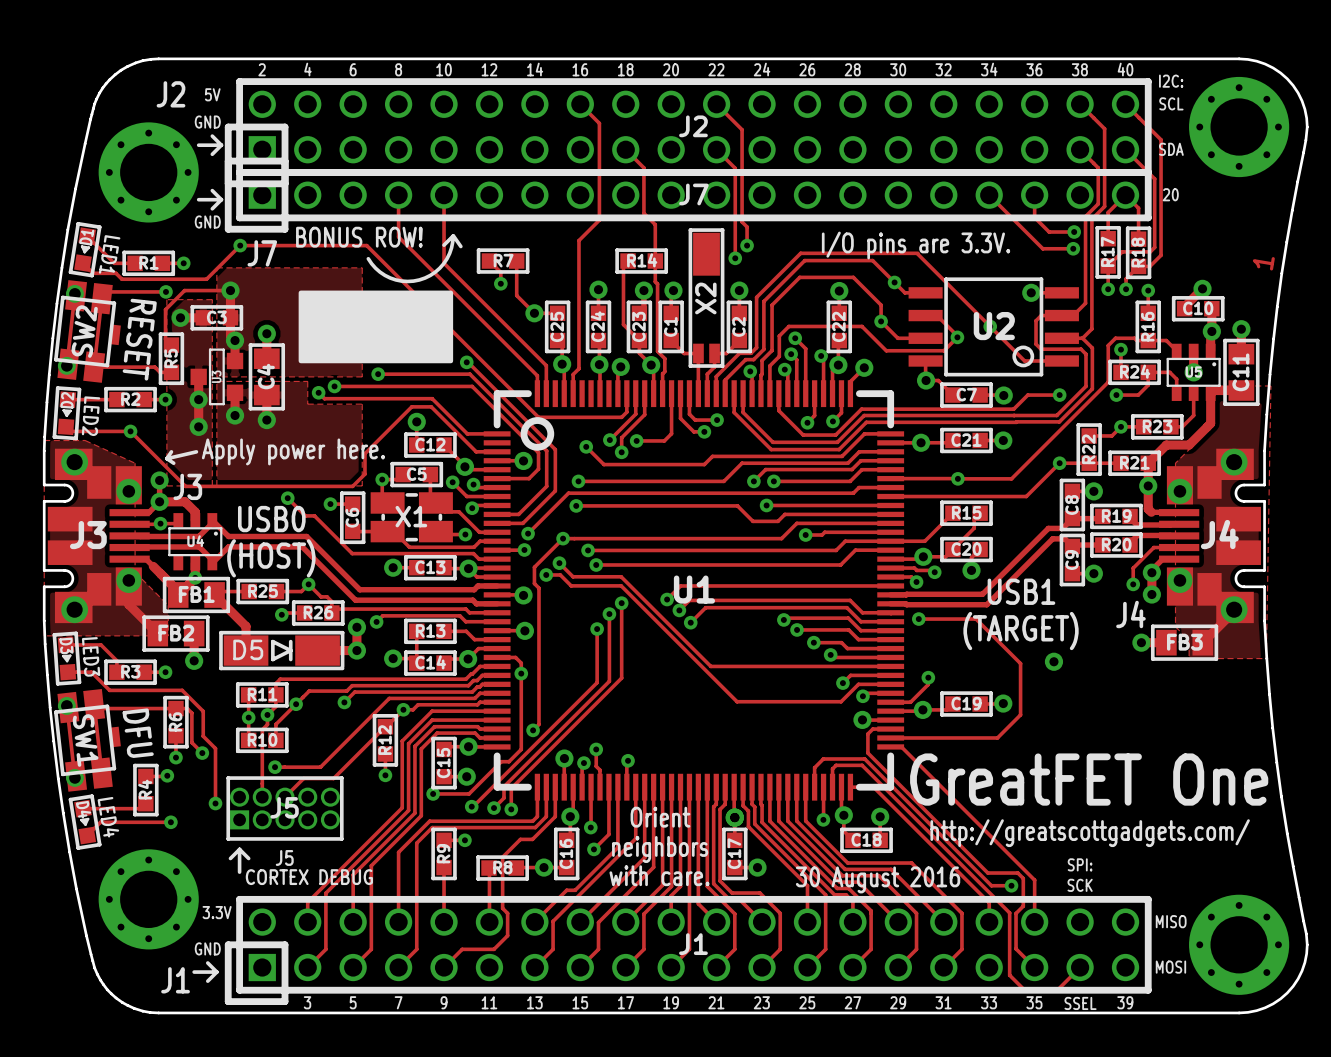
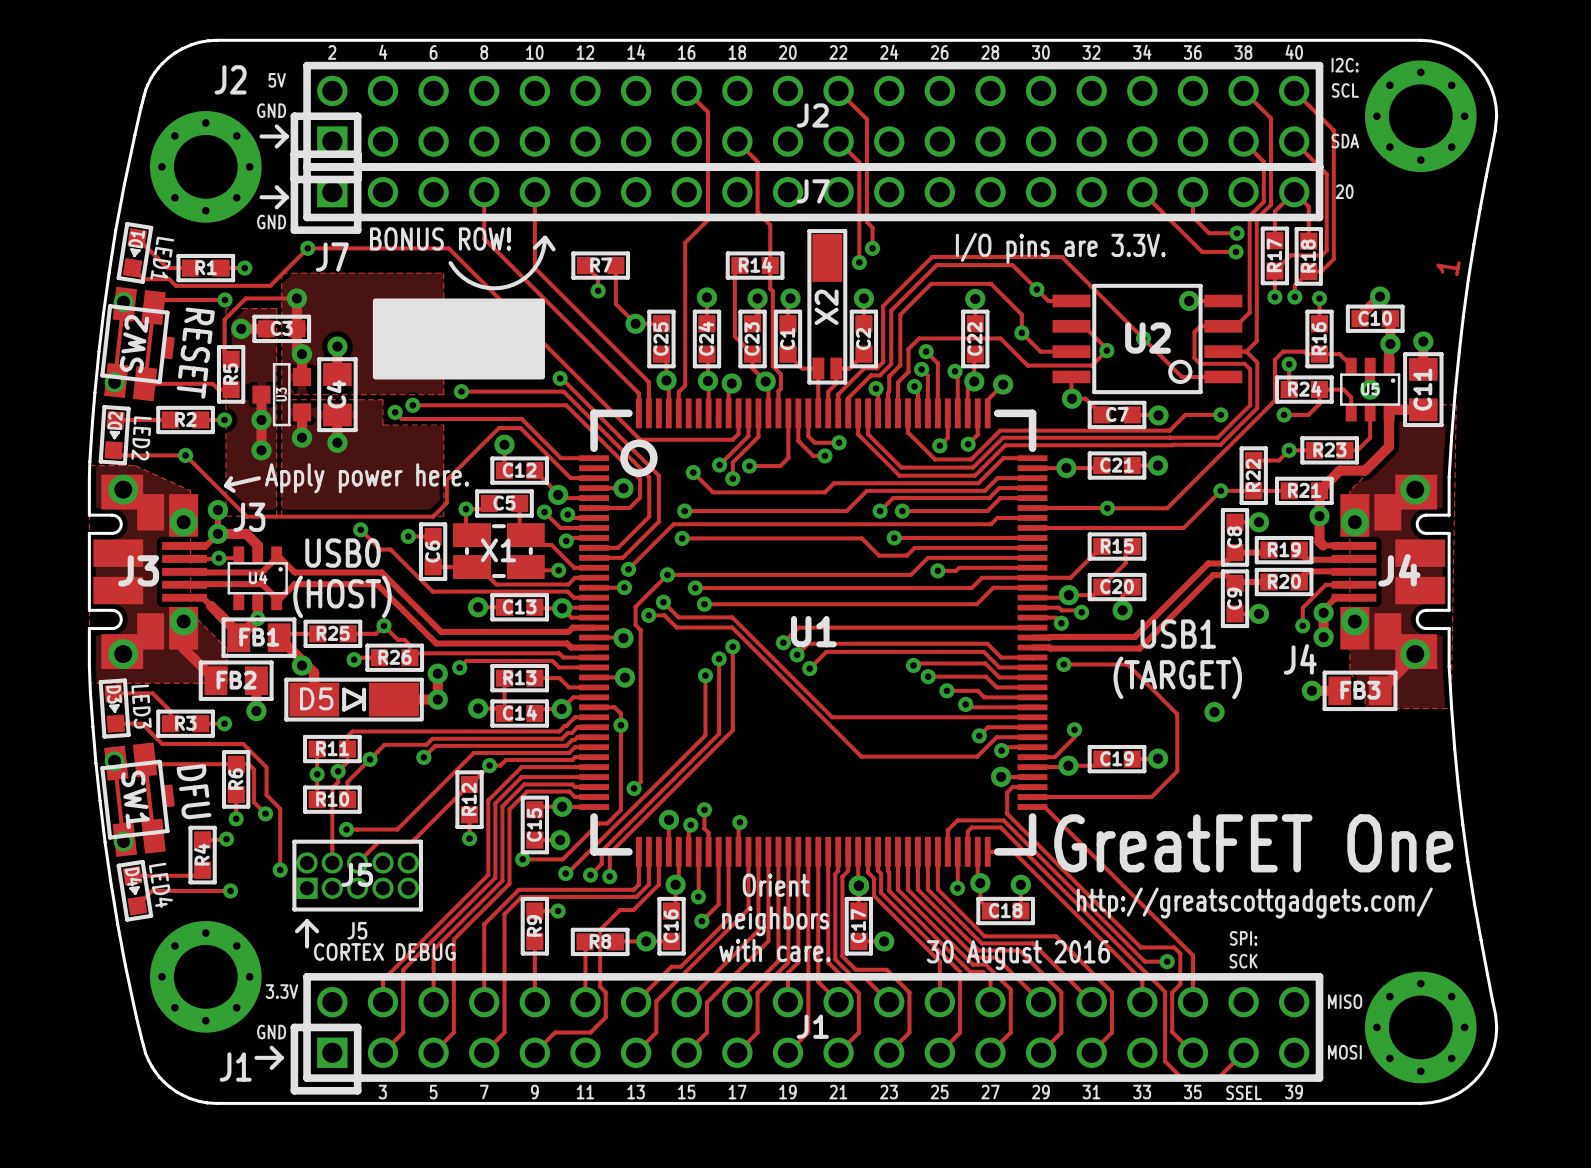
via: none -> (301, 665)

